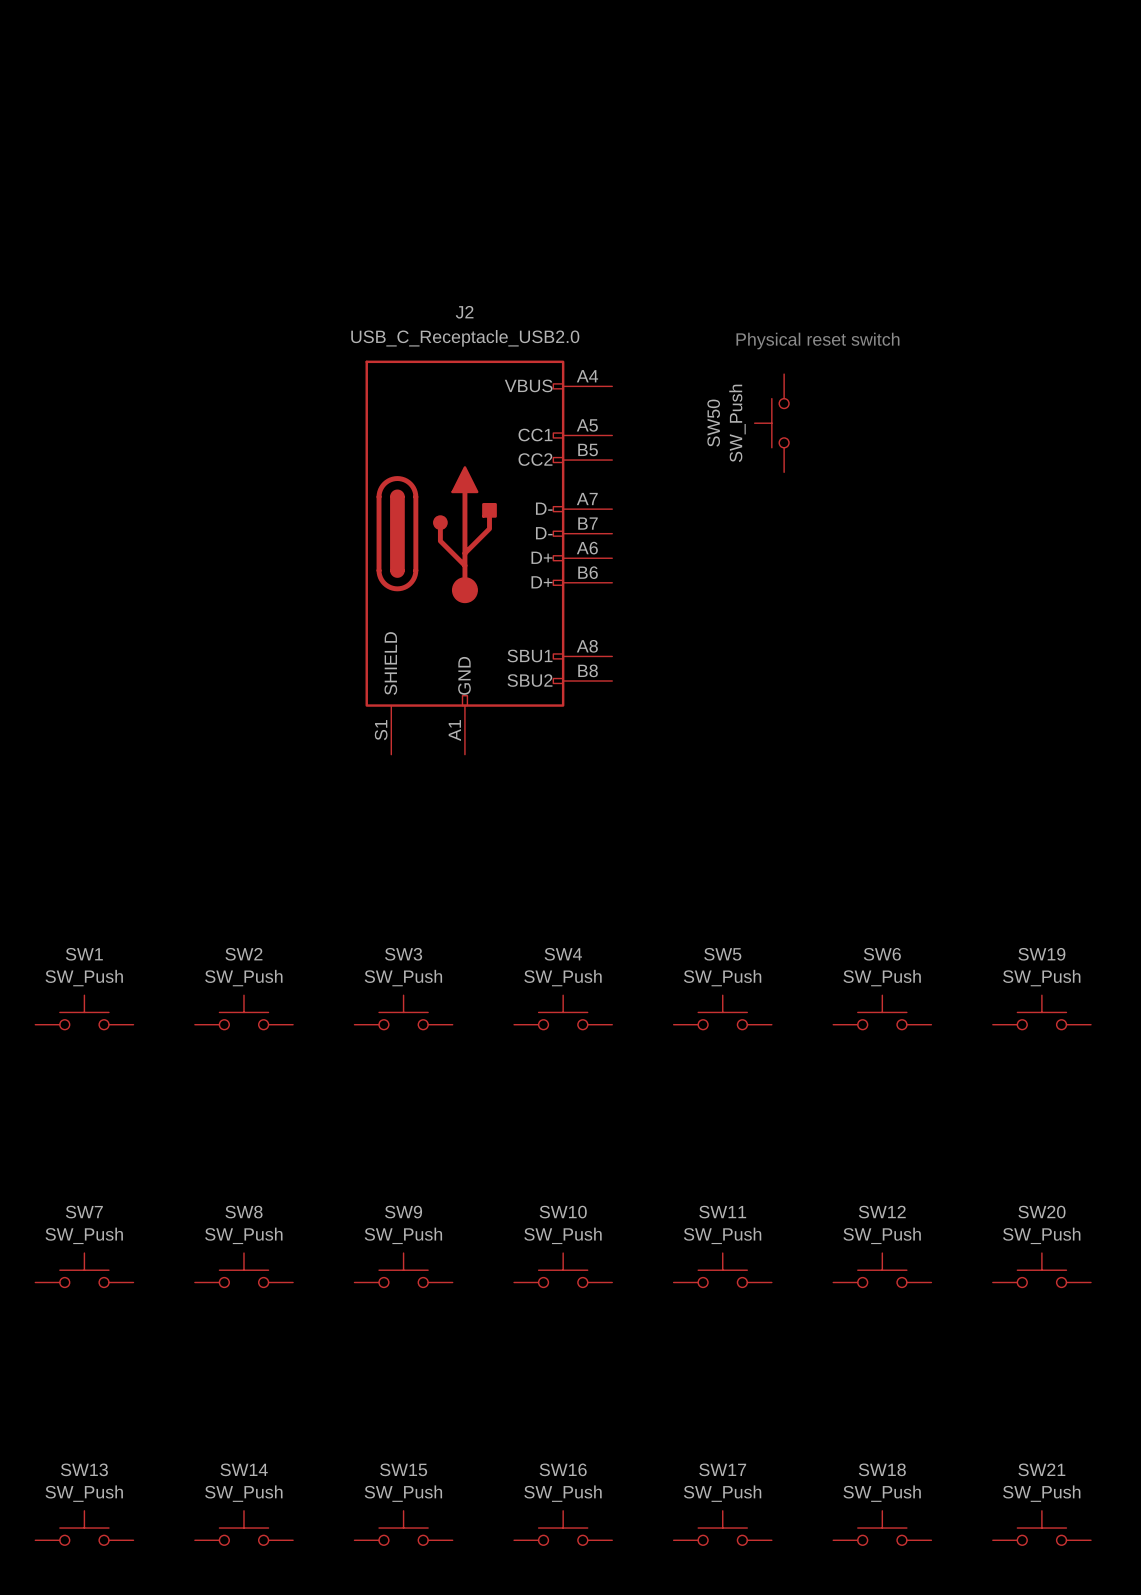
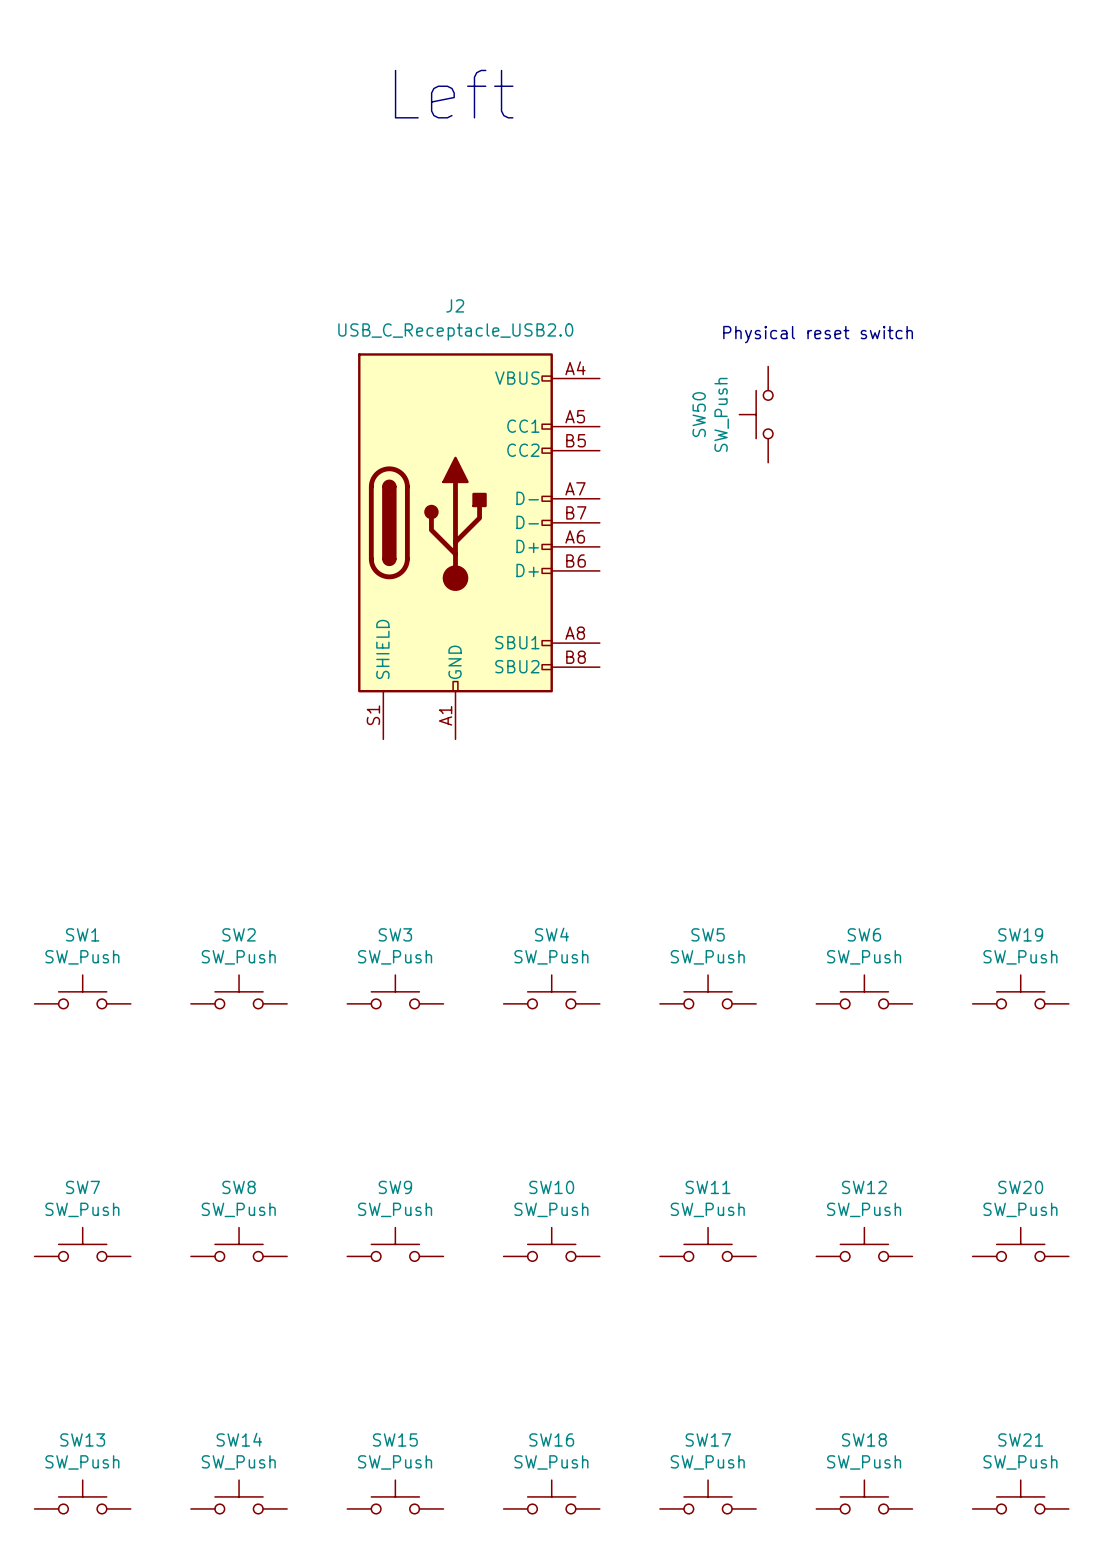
text: none -> Left (454, 94)

